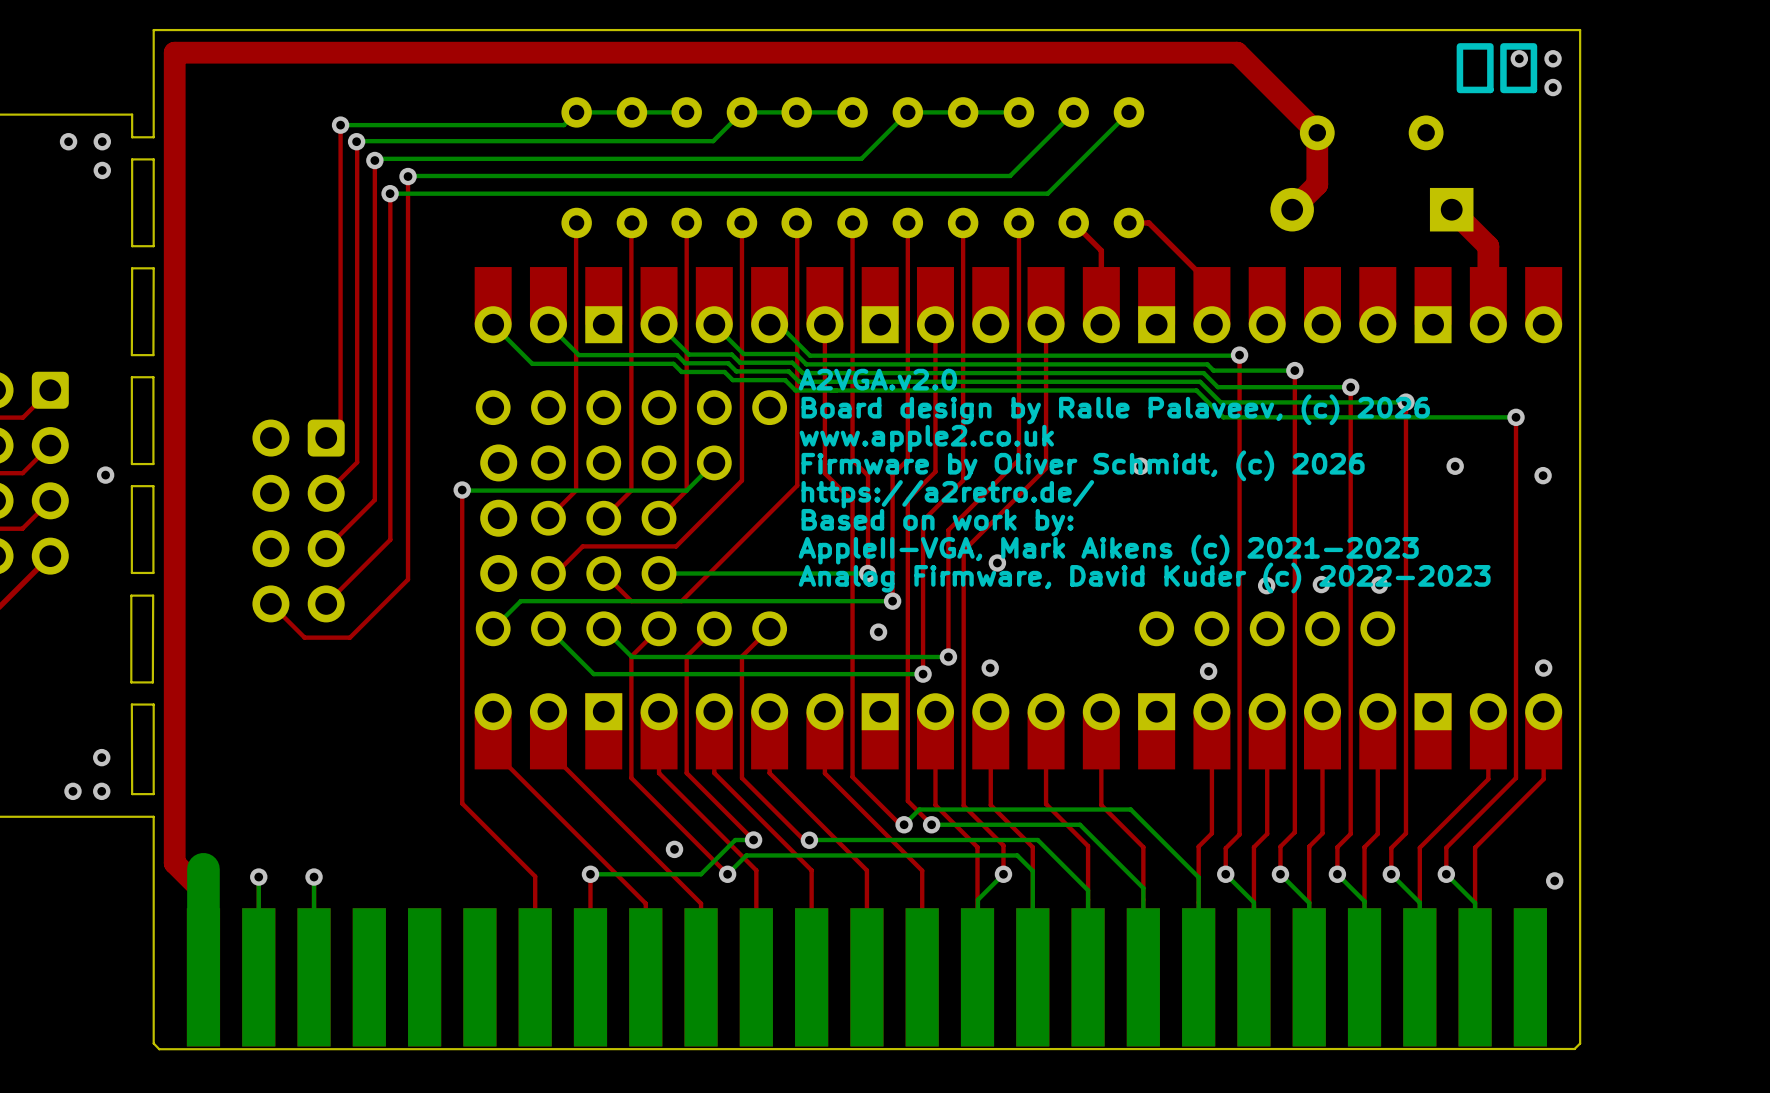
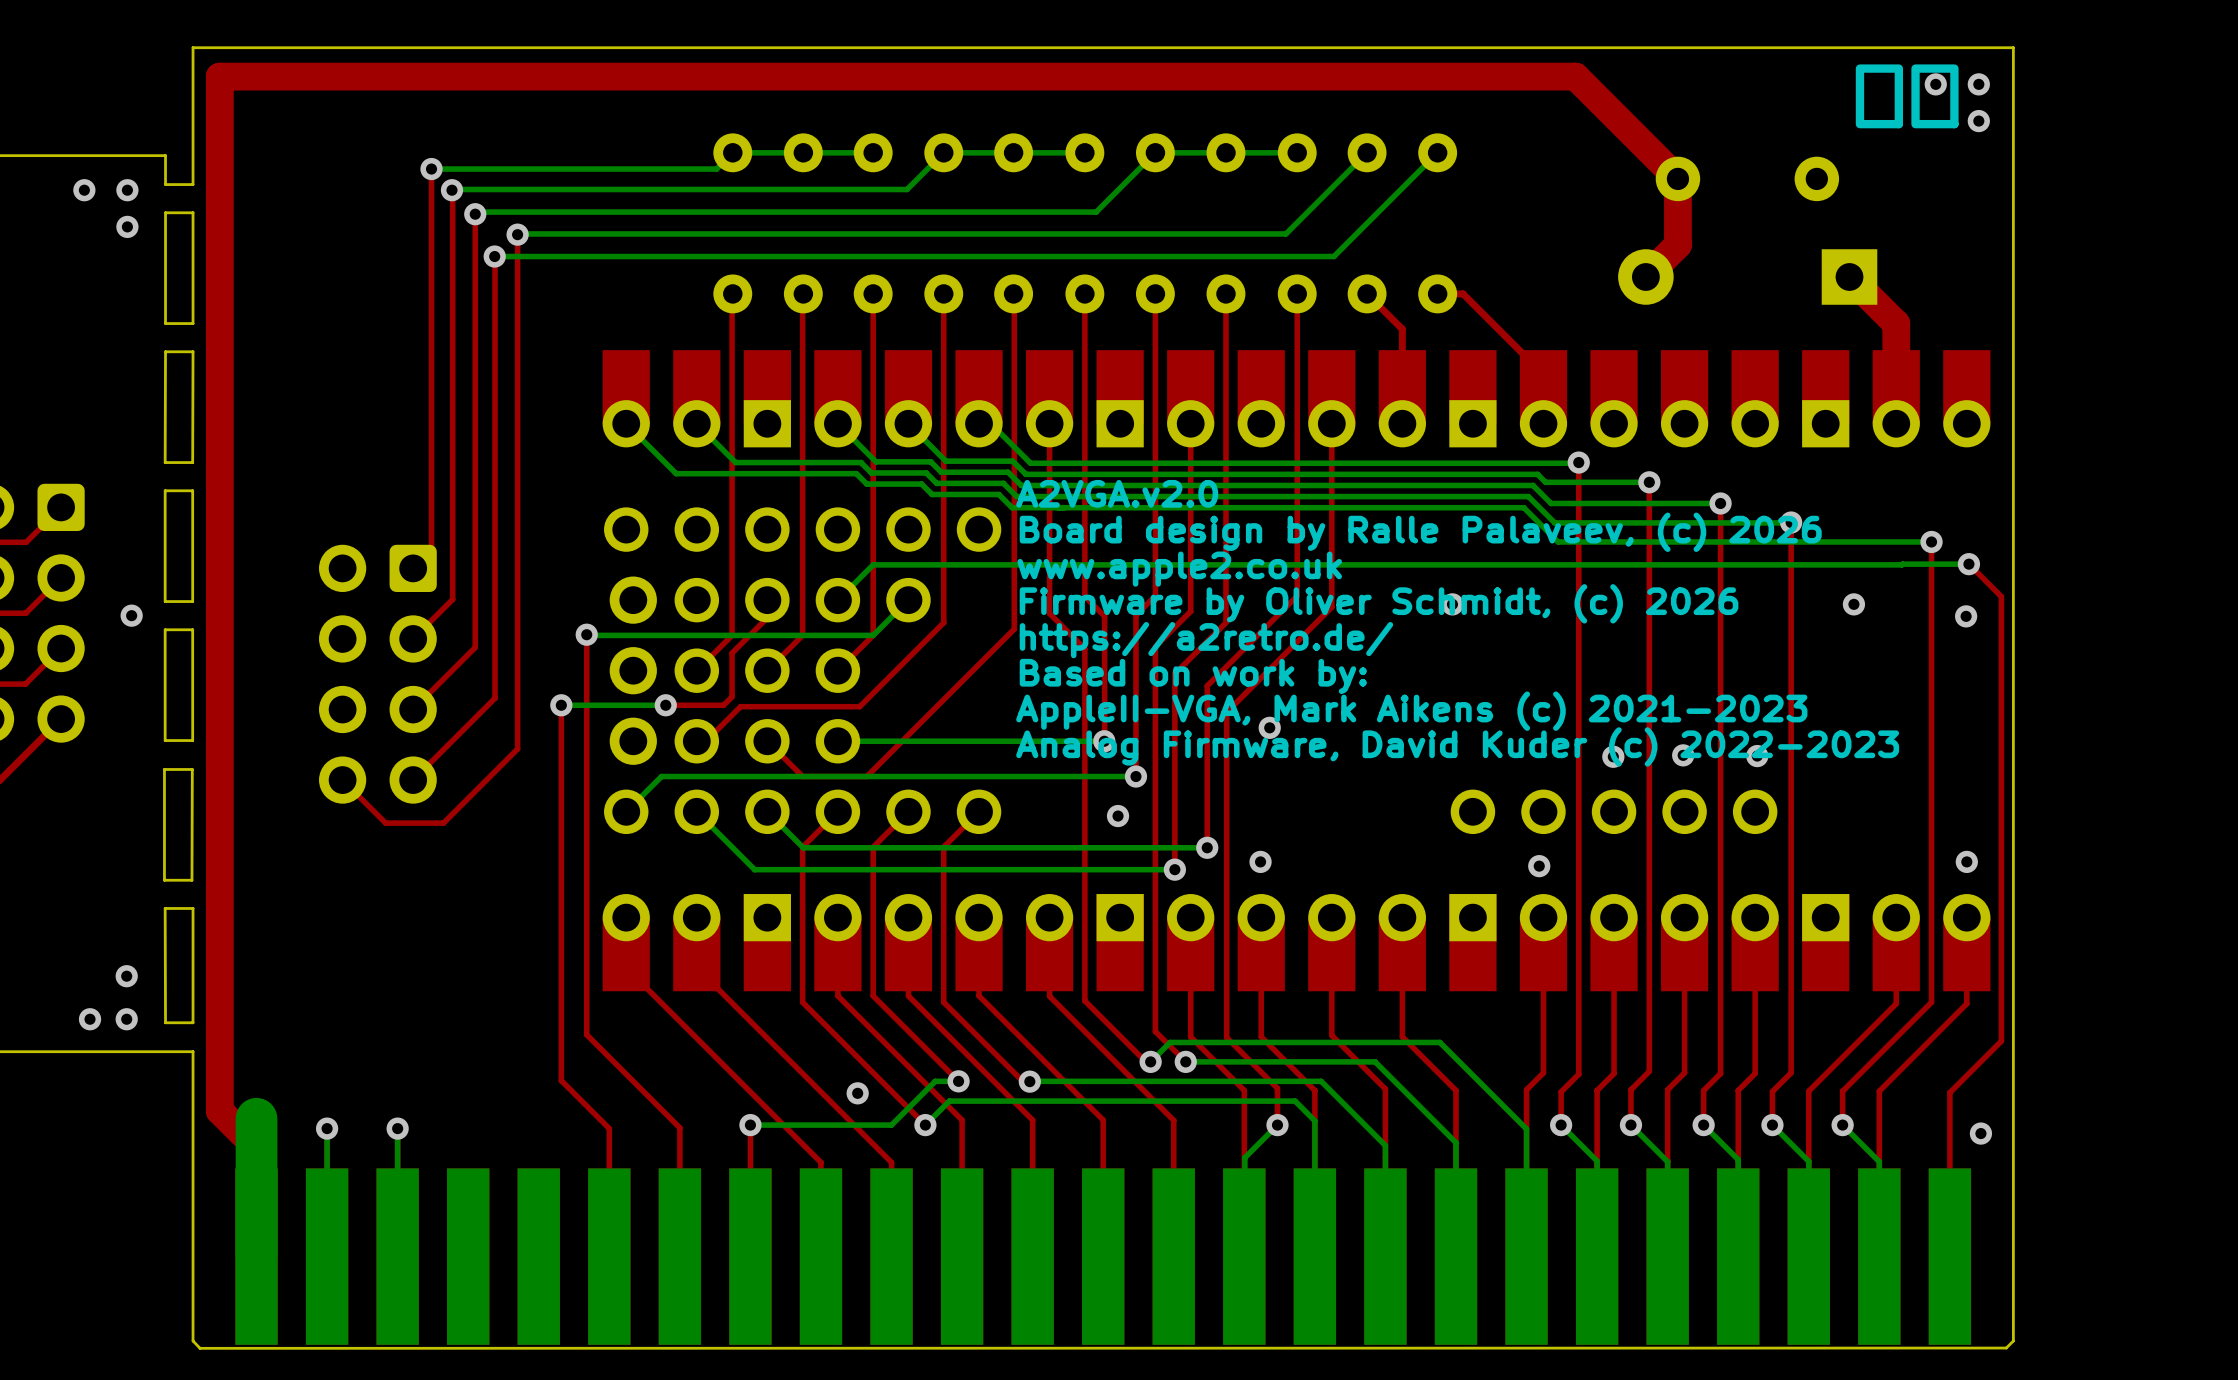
top track: none -> (1968, 564) (2001, 596) (2001, 1041) (1949, 1092) (1949, 1256)
bottom track: none -> (1968, 564) (873, 564) (837, 600)
via: none -> (1968, 564)
top track: none -> (767, 600) (767, 617) (732, 653) (732, 696) (723, 705) (665, 705)
top track: none -> (561, 705) (561, 1080) (609, 1128) (609, 1256)
via: none -> (561, 705)
bottom track: none -> (665, 705) (561, 705)
via: none -> (665, 705)

